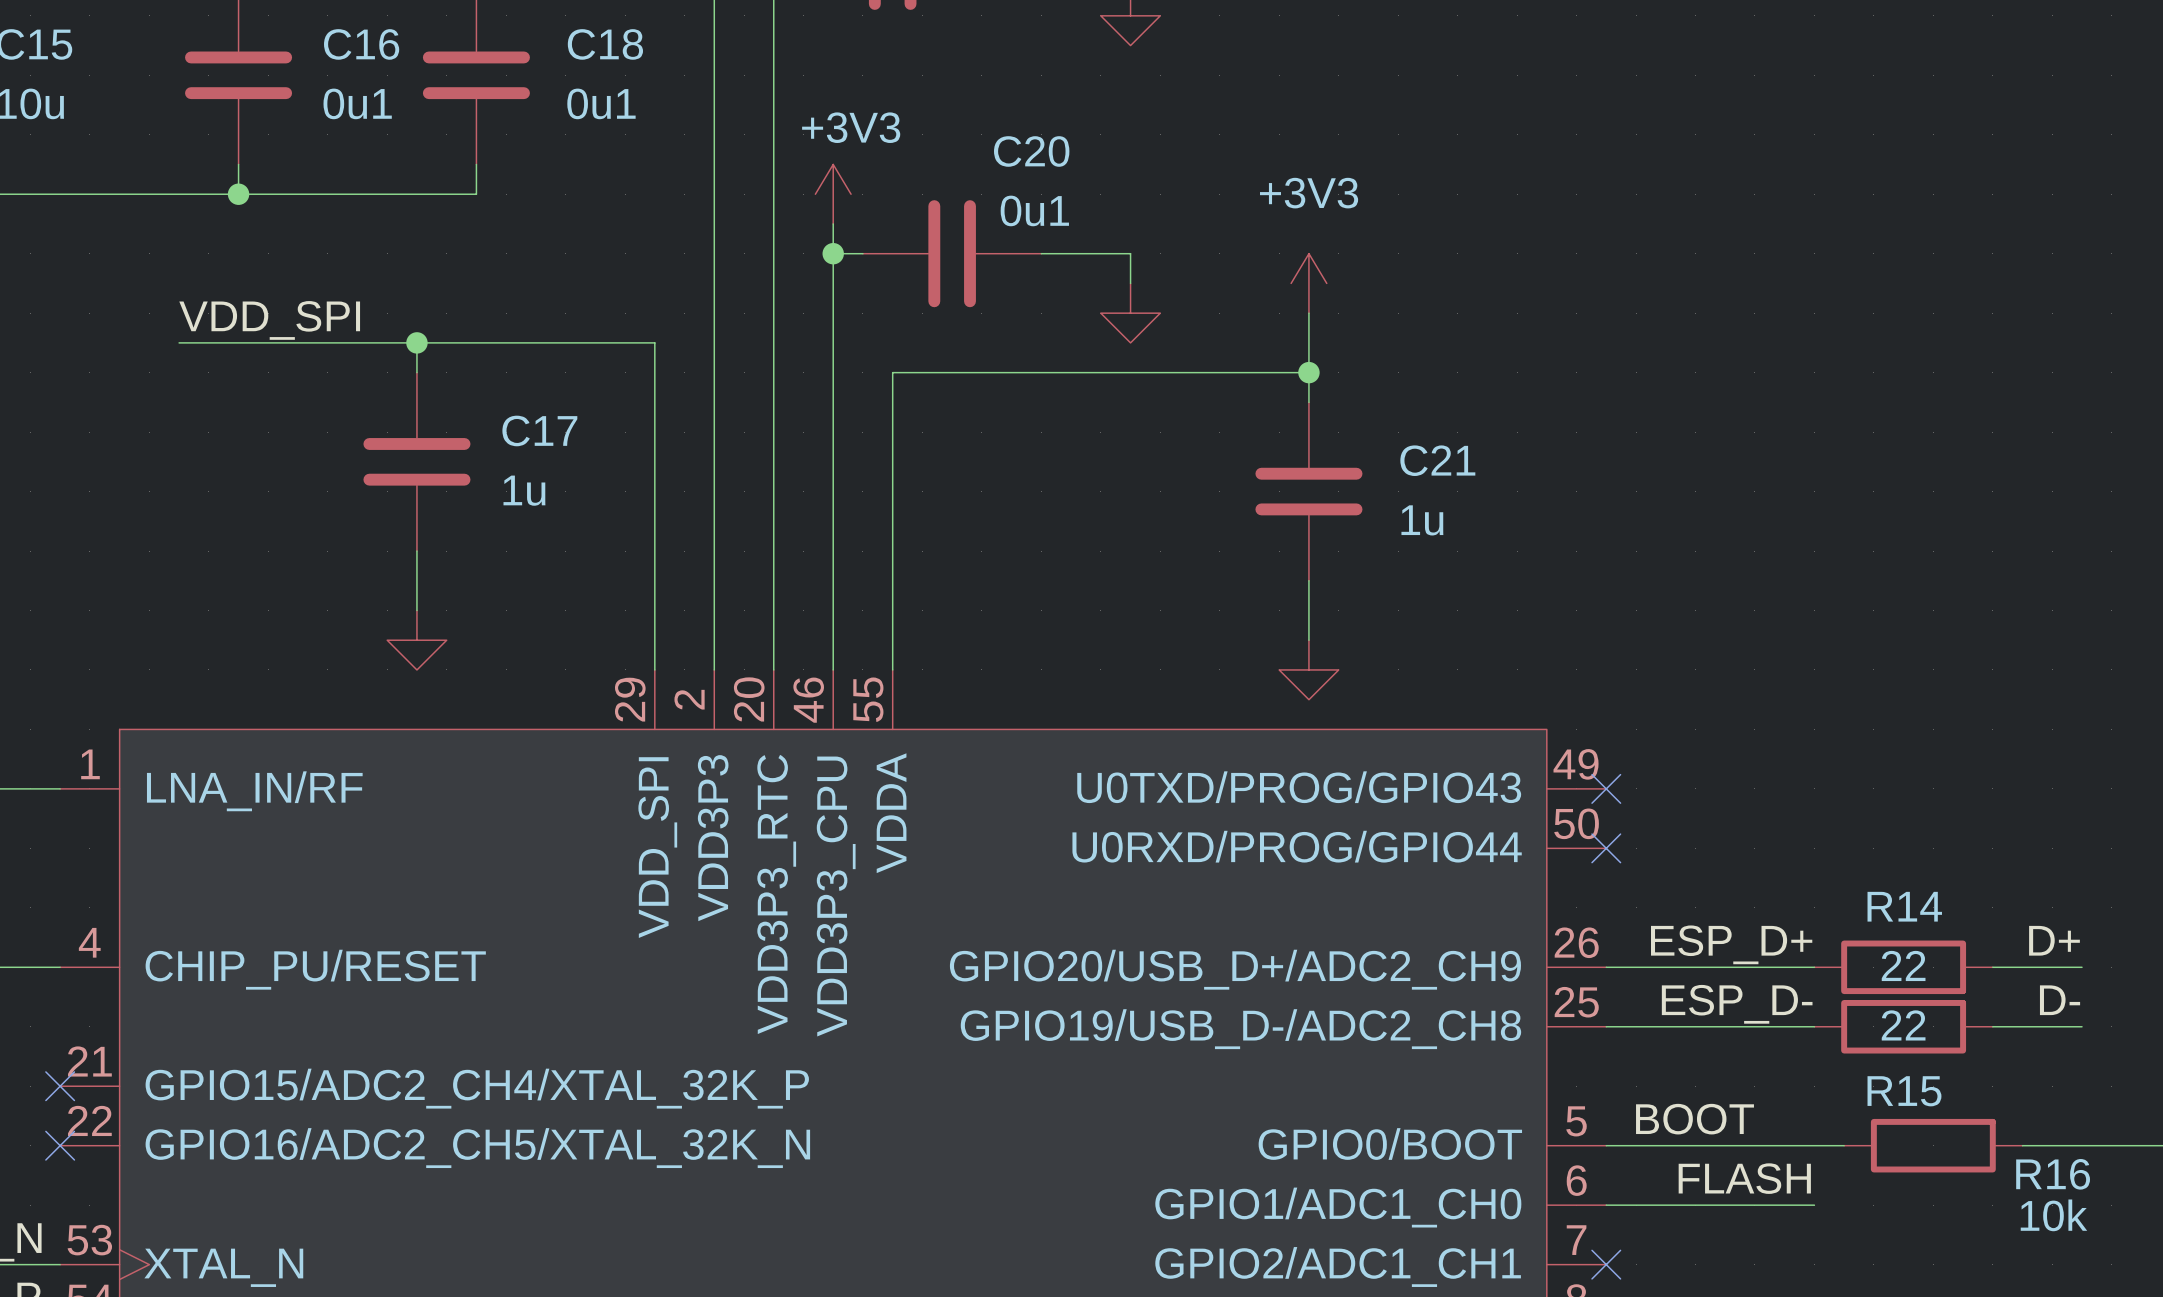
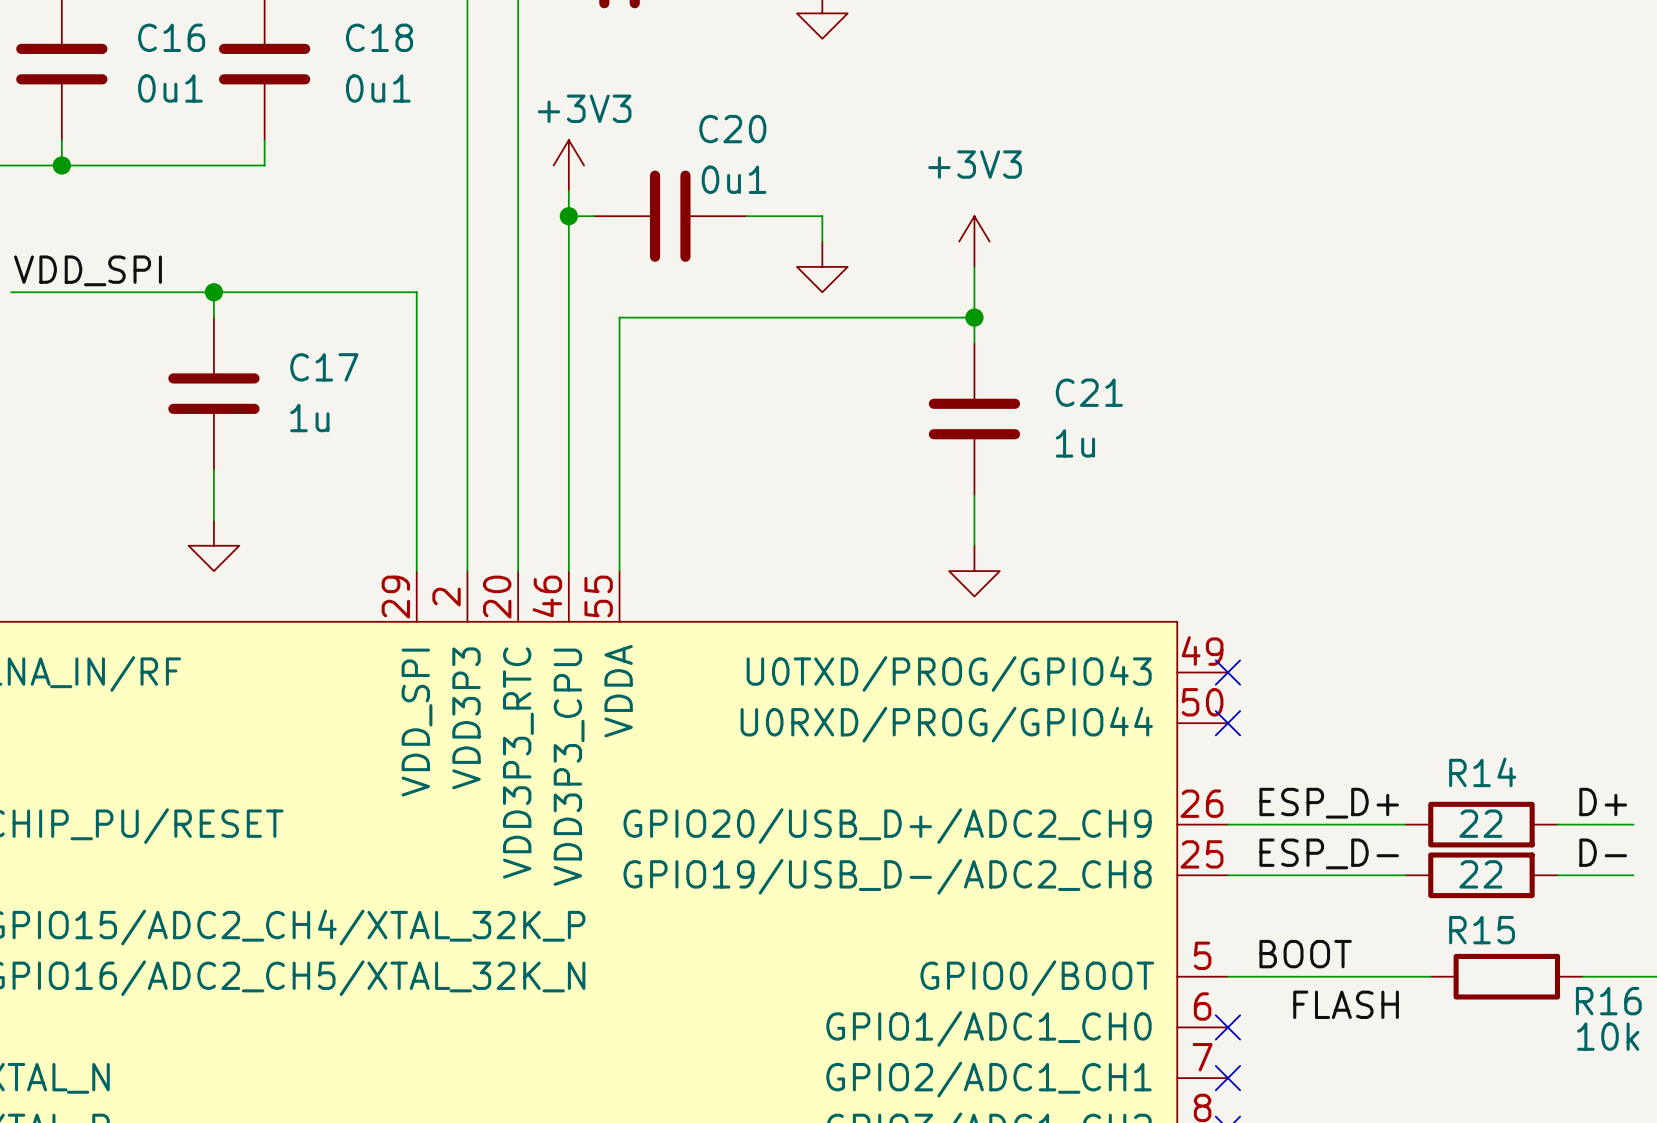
wire: (1606, 1205) (1814, 1205) -> none
no-connect mark: none -> (1227, 1027)

